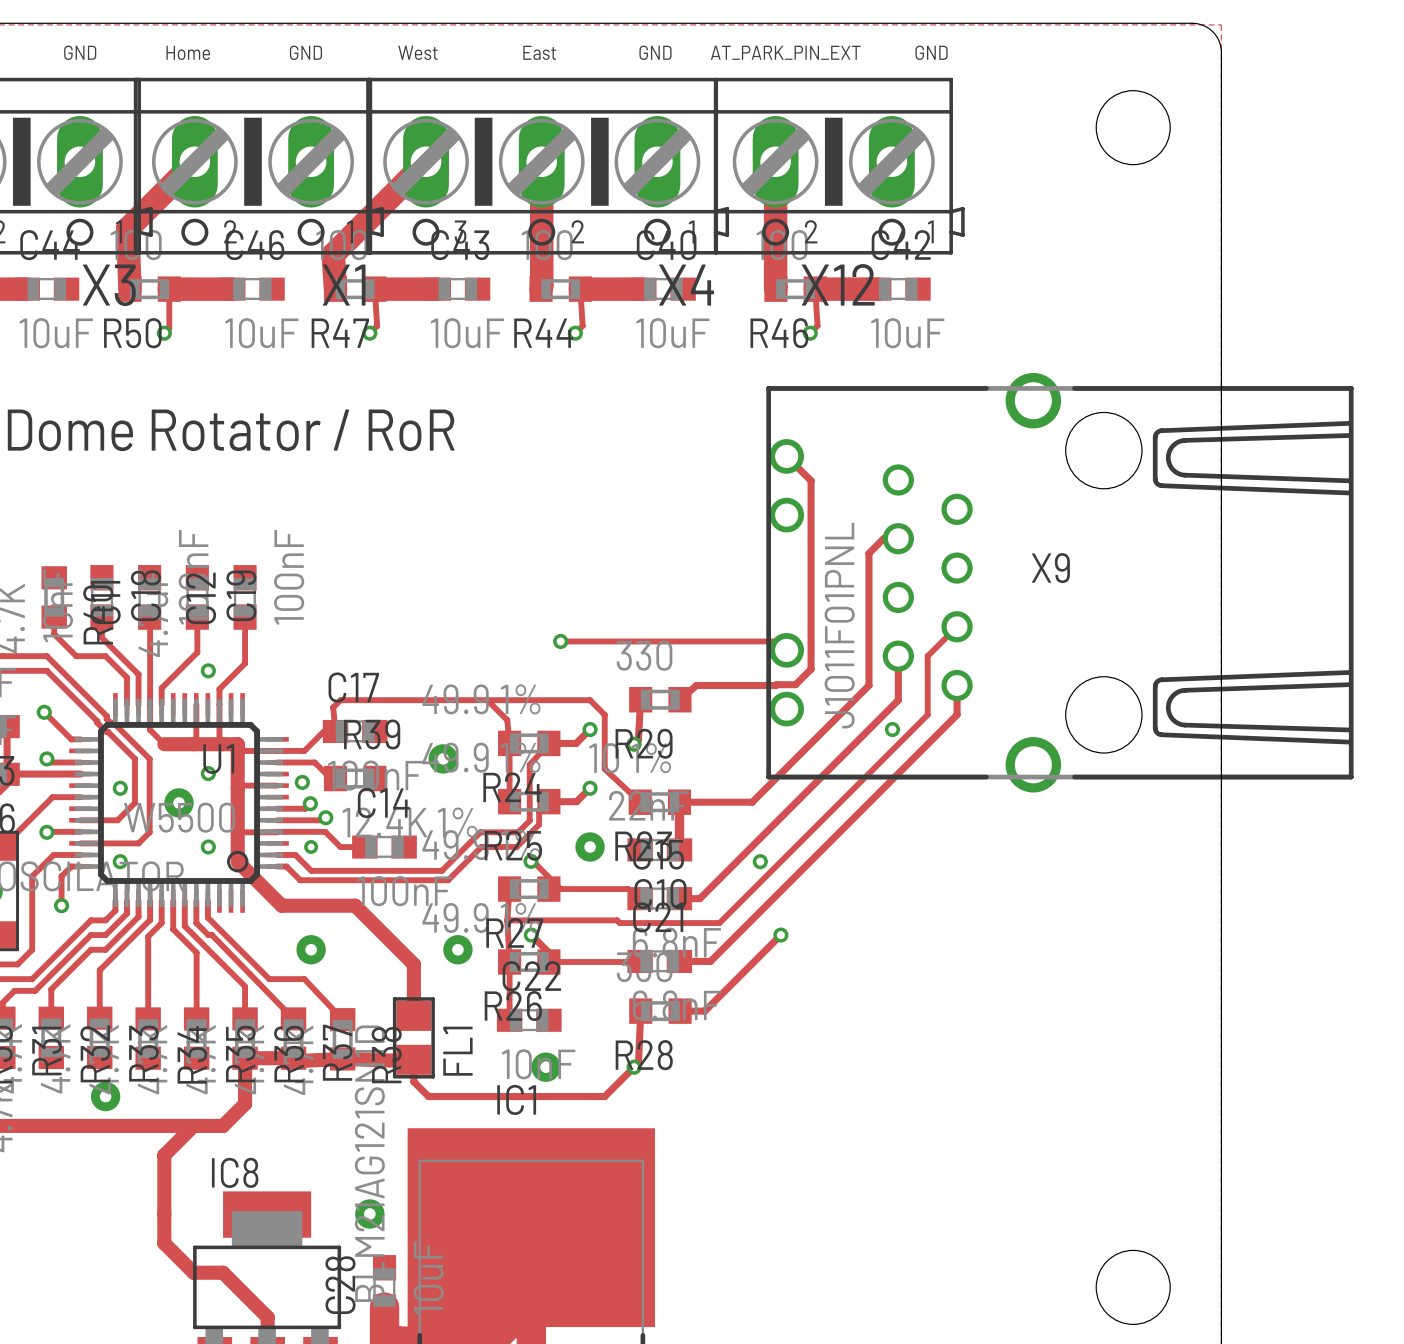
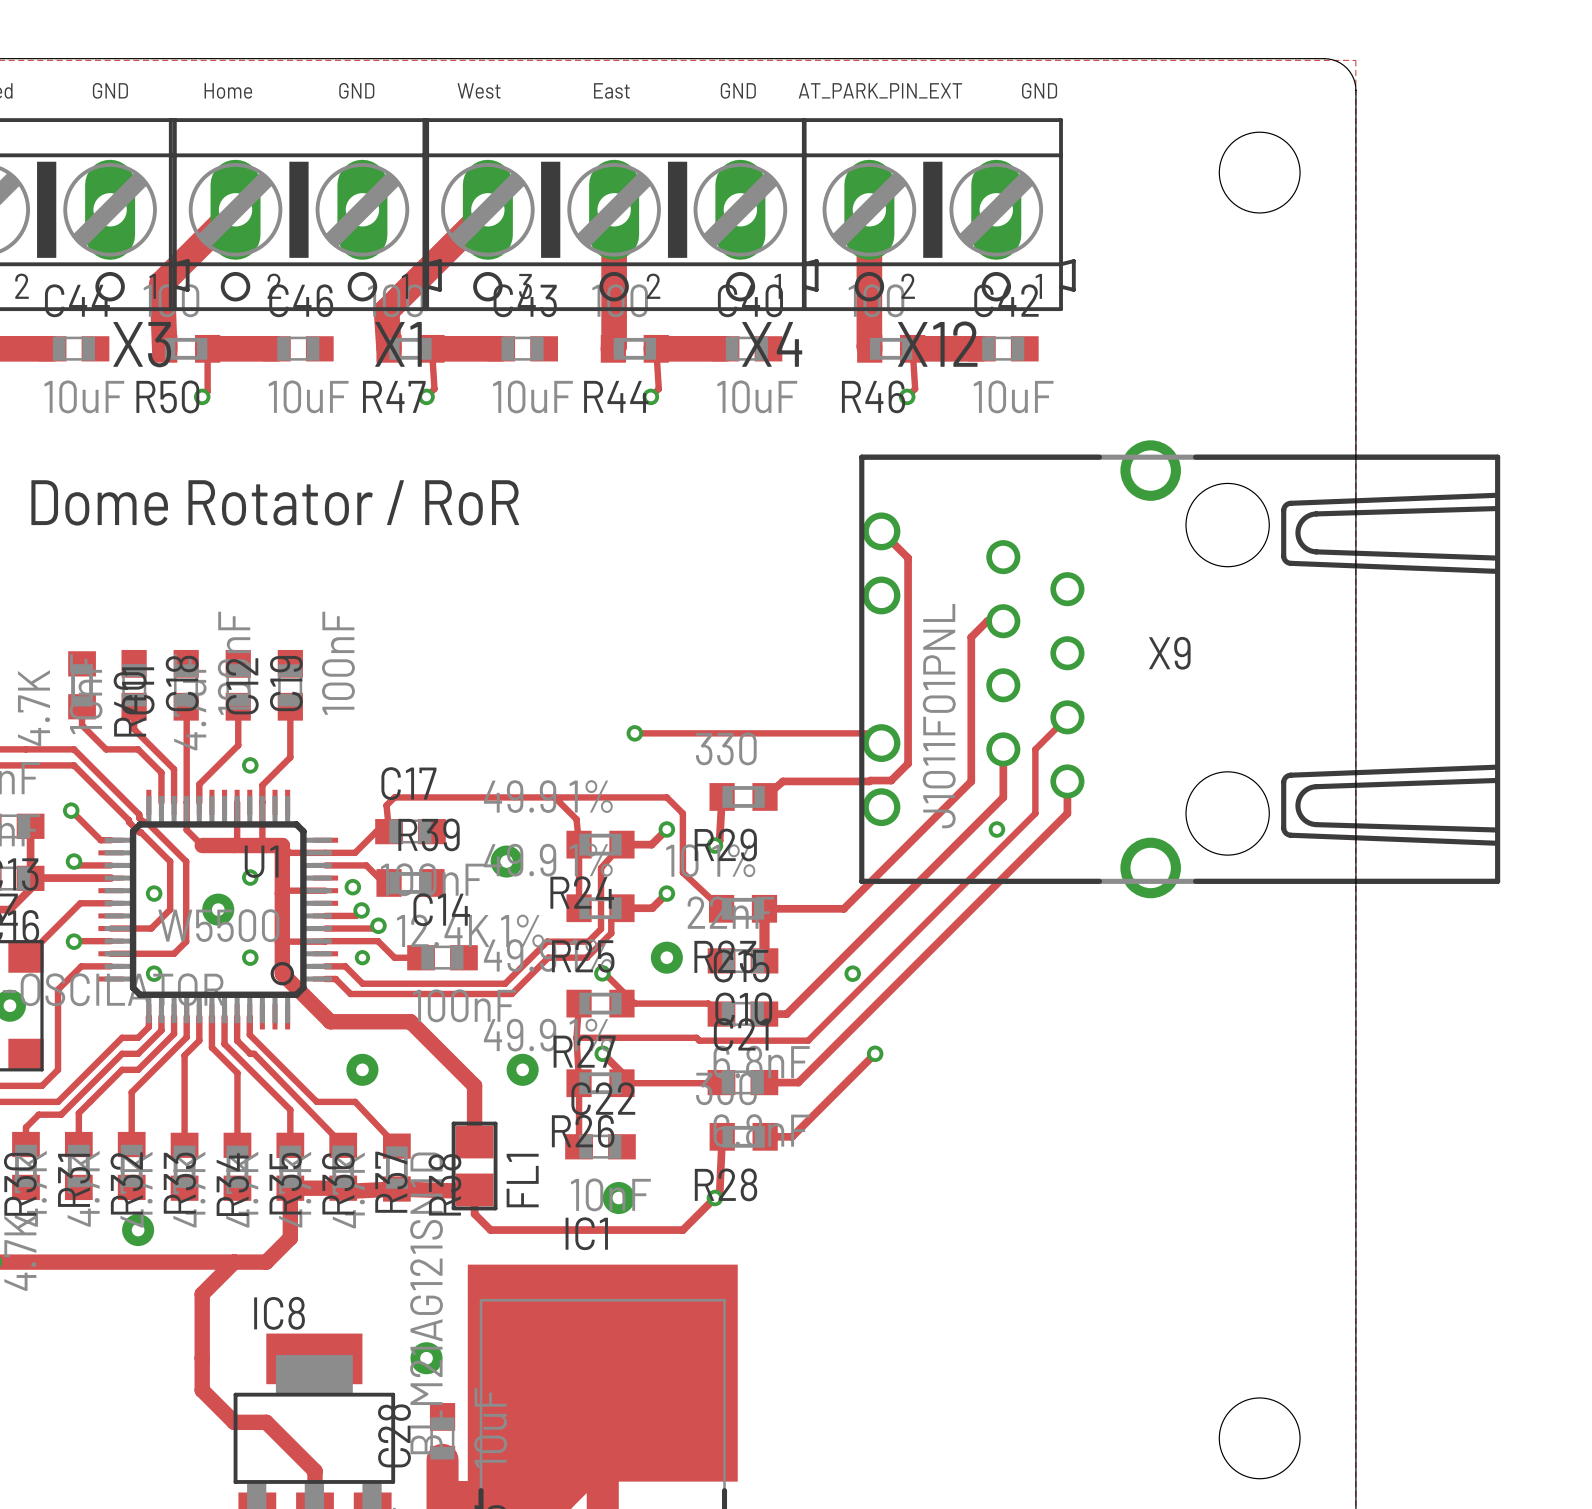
track: (80, 866) (71, 866) (61, 876) (61, 905) -> none
via: (61, 905) -> none

